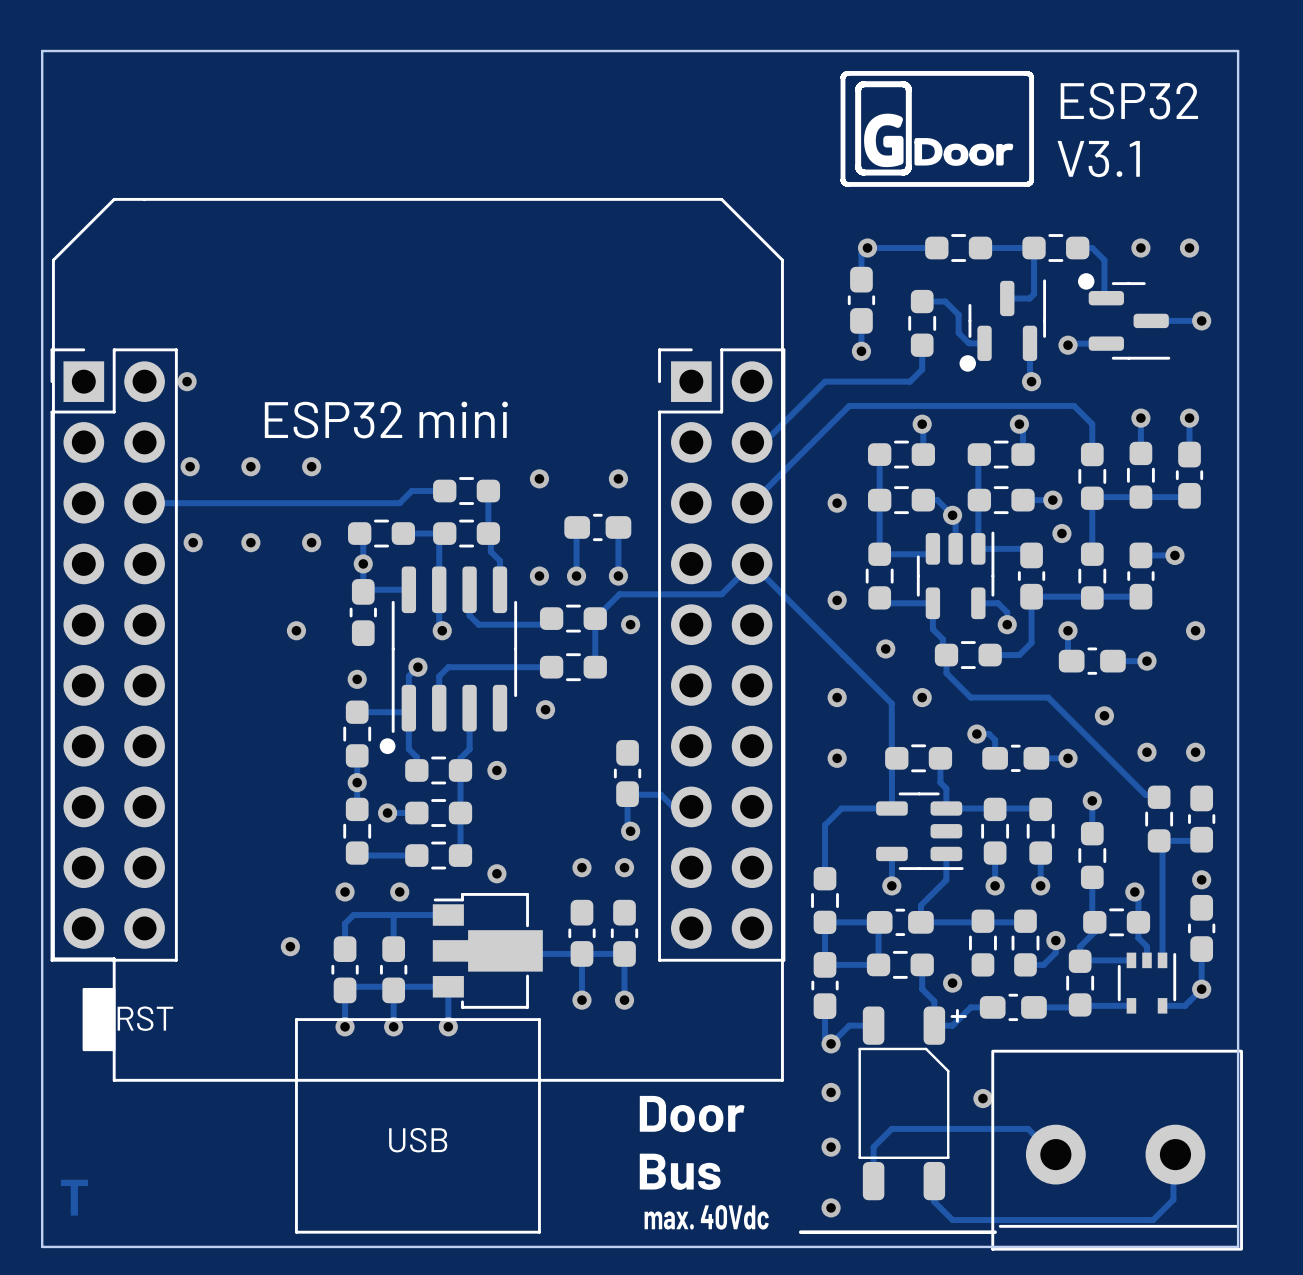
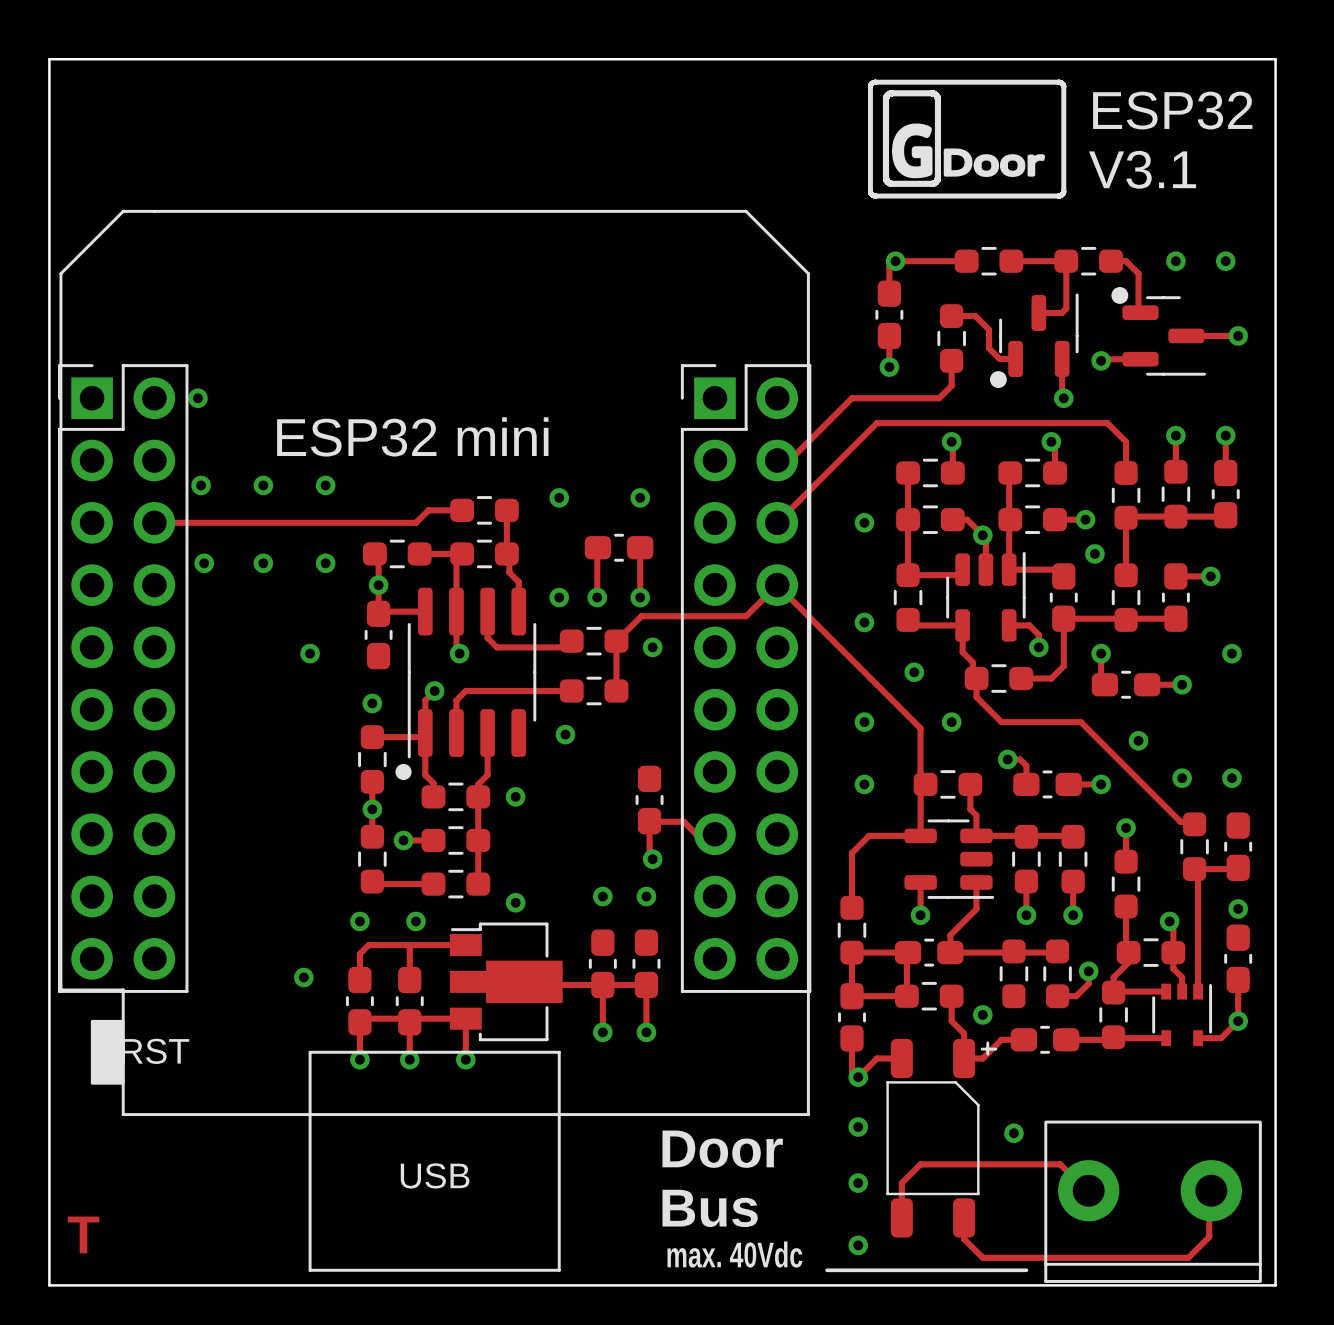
part footprint: [991, 1049, 1243, 1251] -> [1044, 1120, 1262, 1283]

